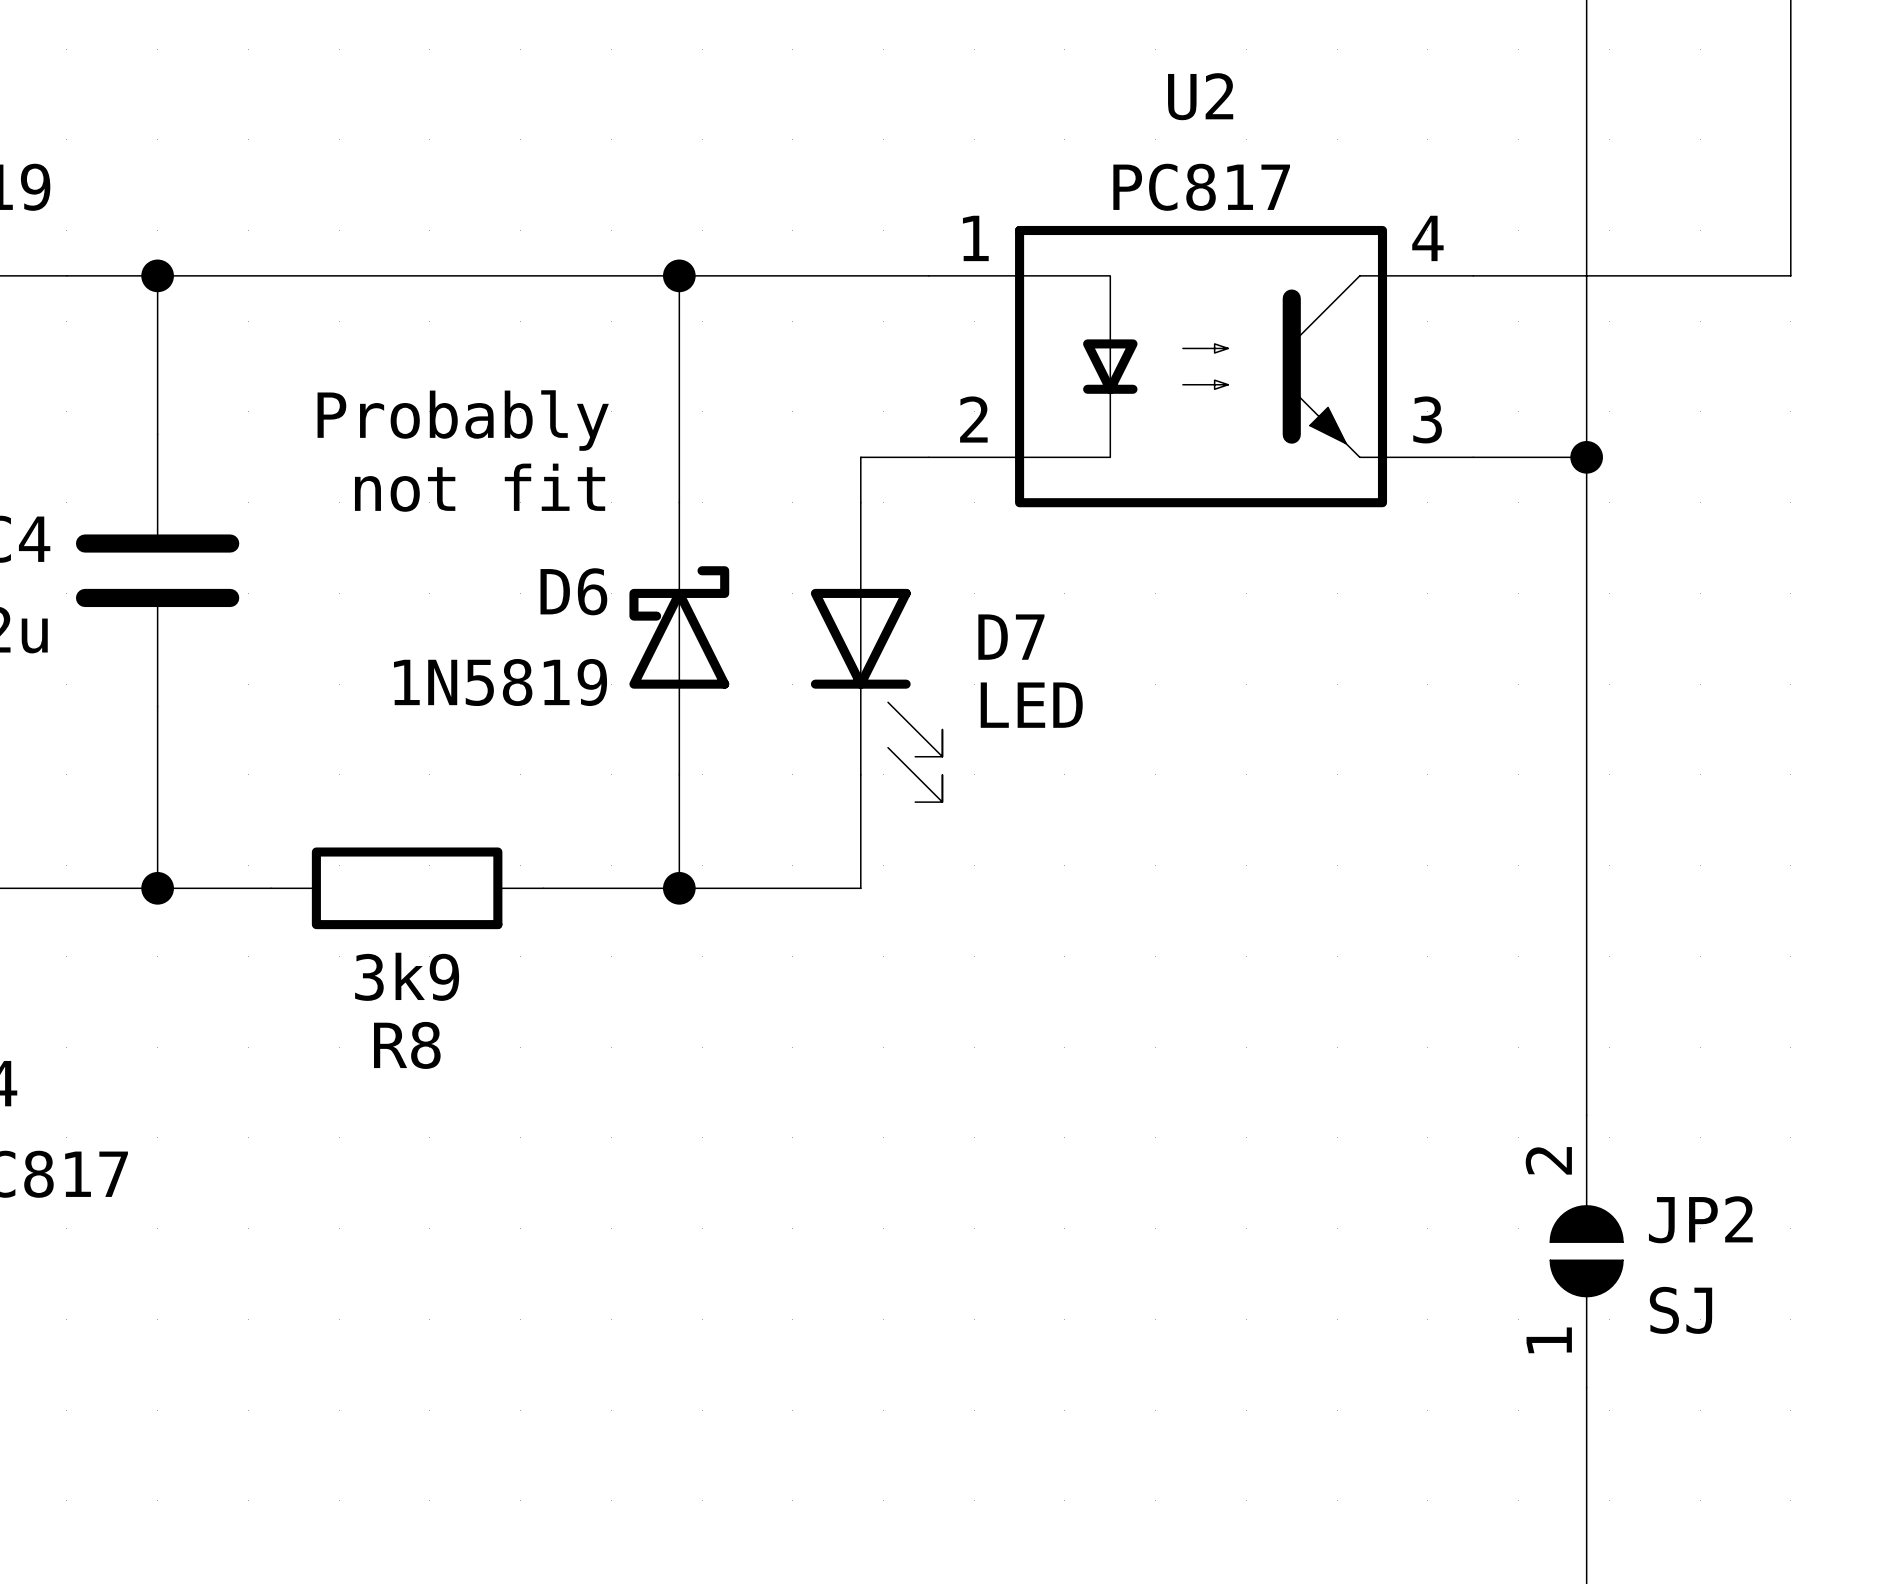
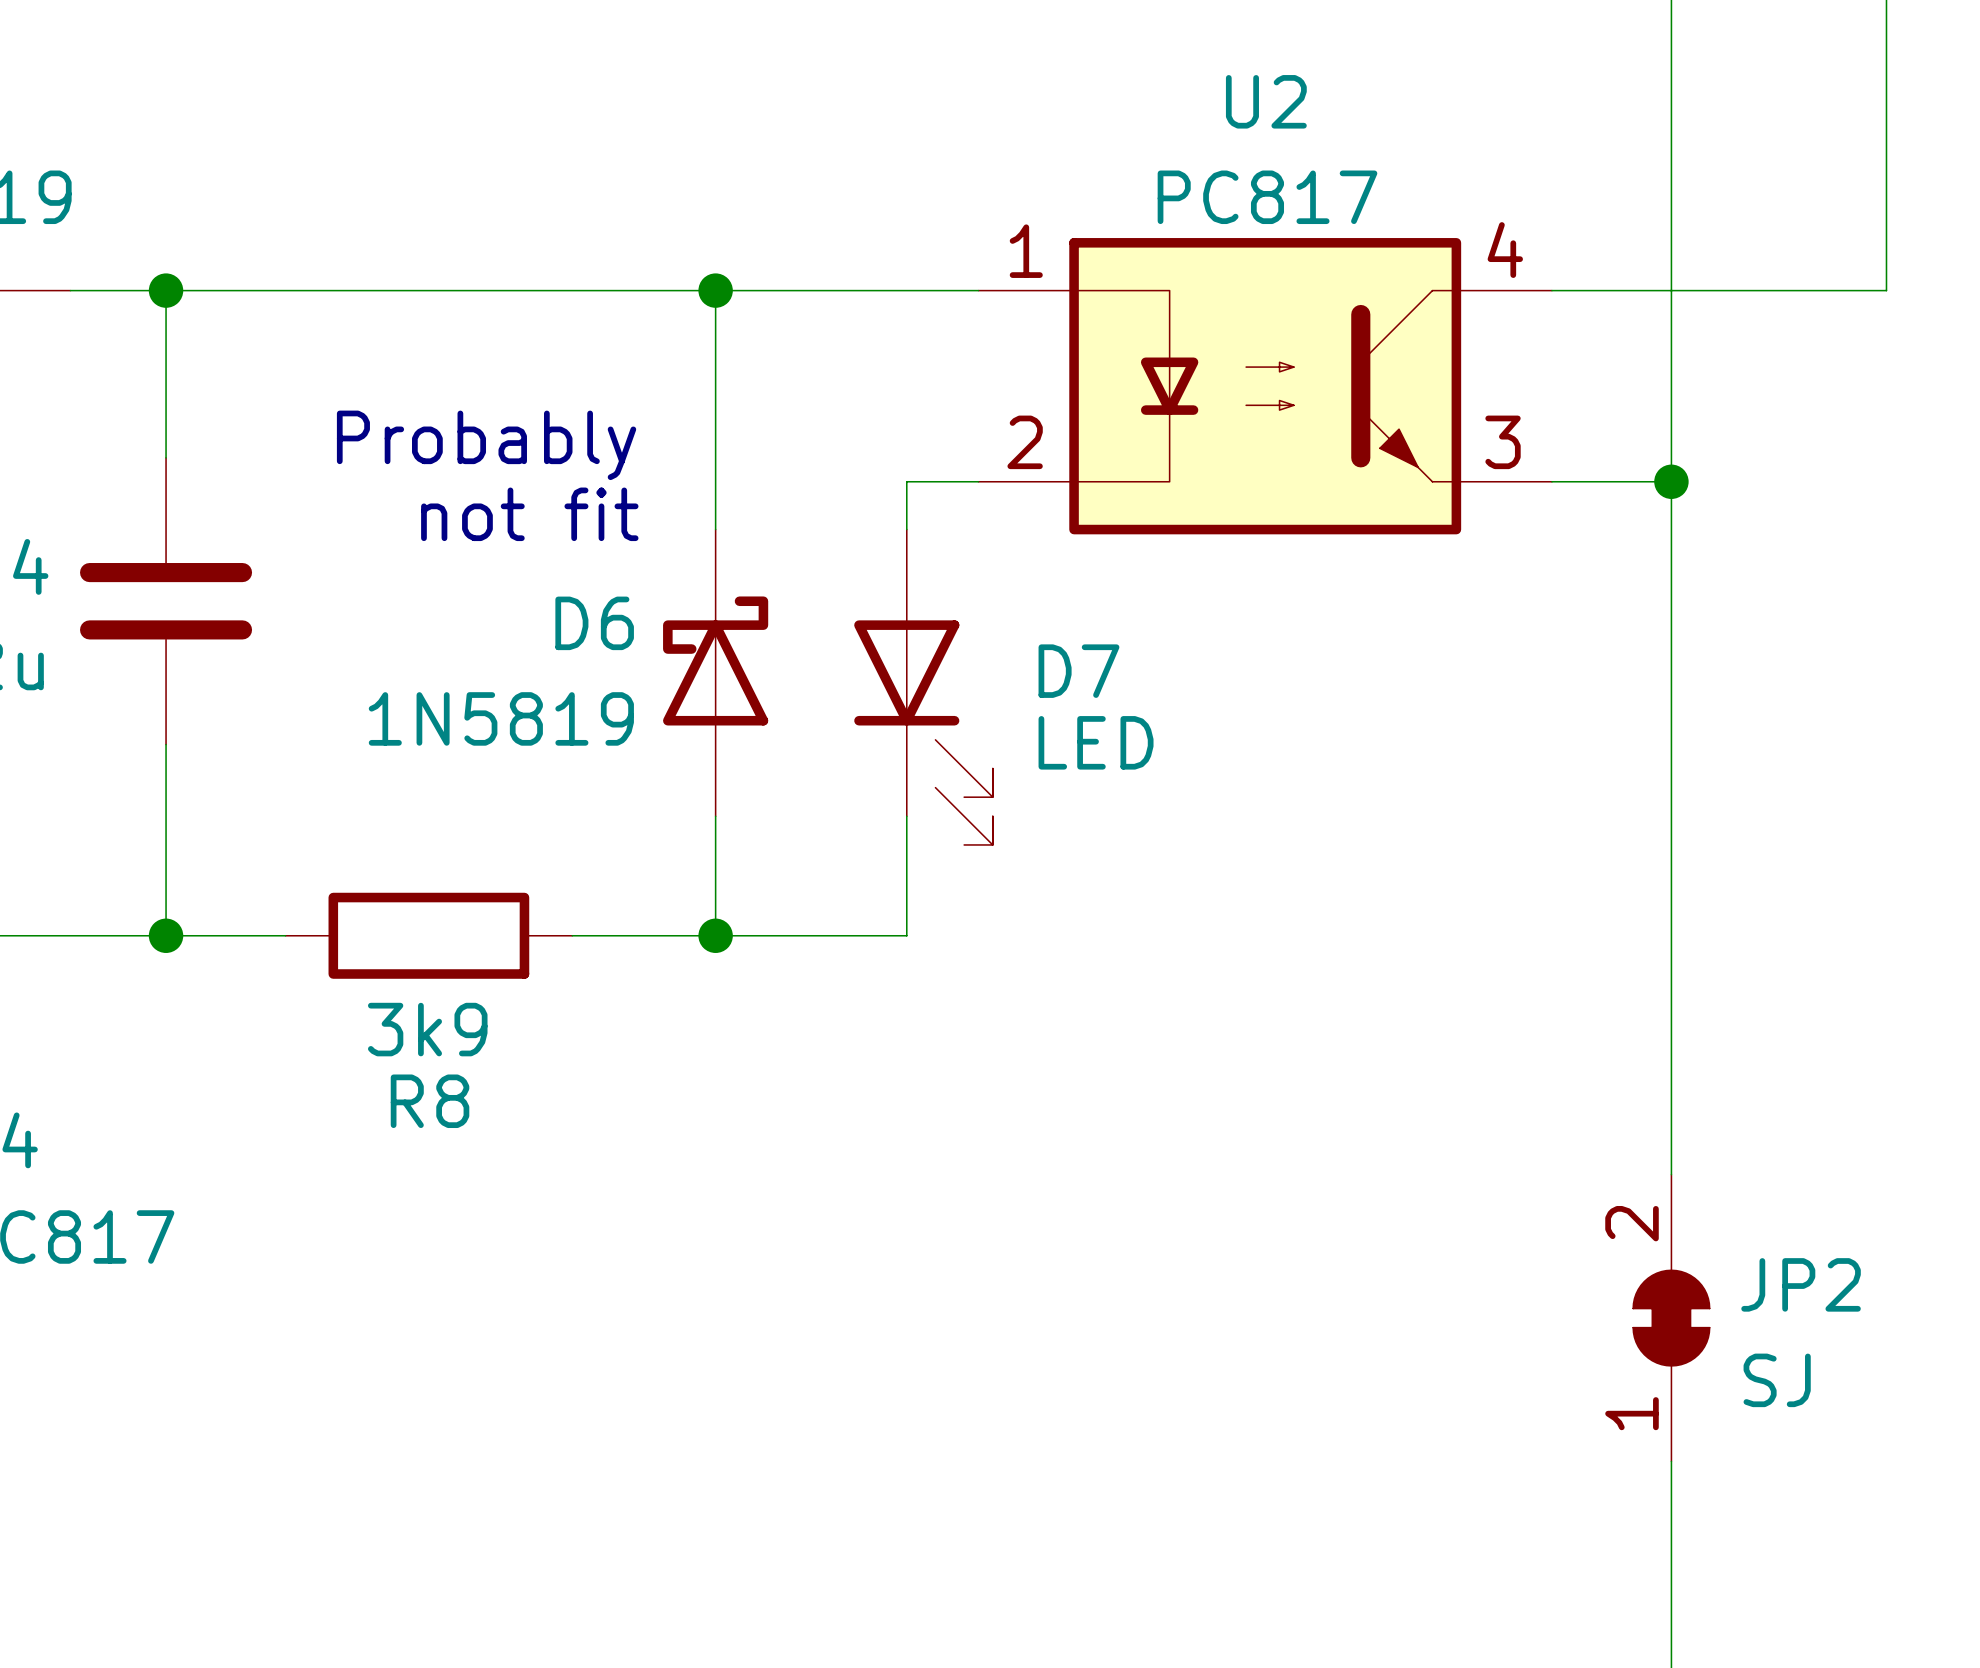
JP2 symbol: [1550, 1115, 1623, 1388] -> [1633, 1174, 1710, 1462]

